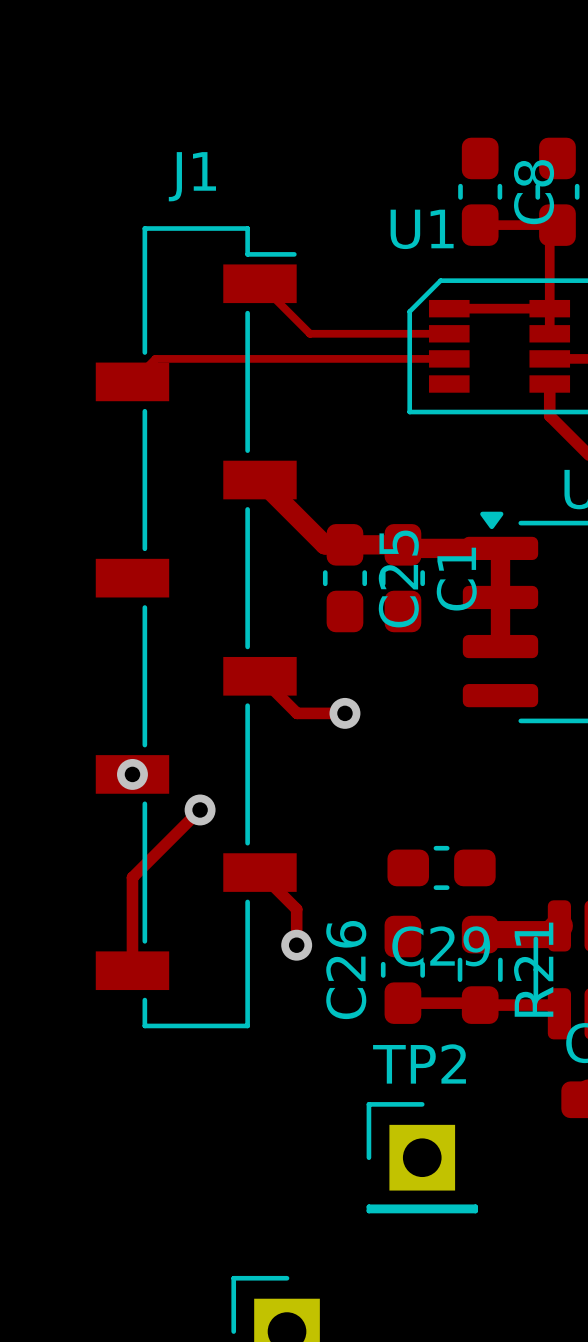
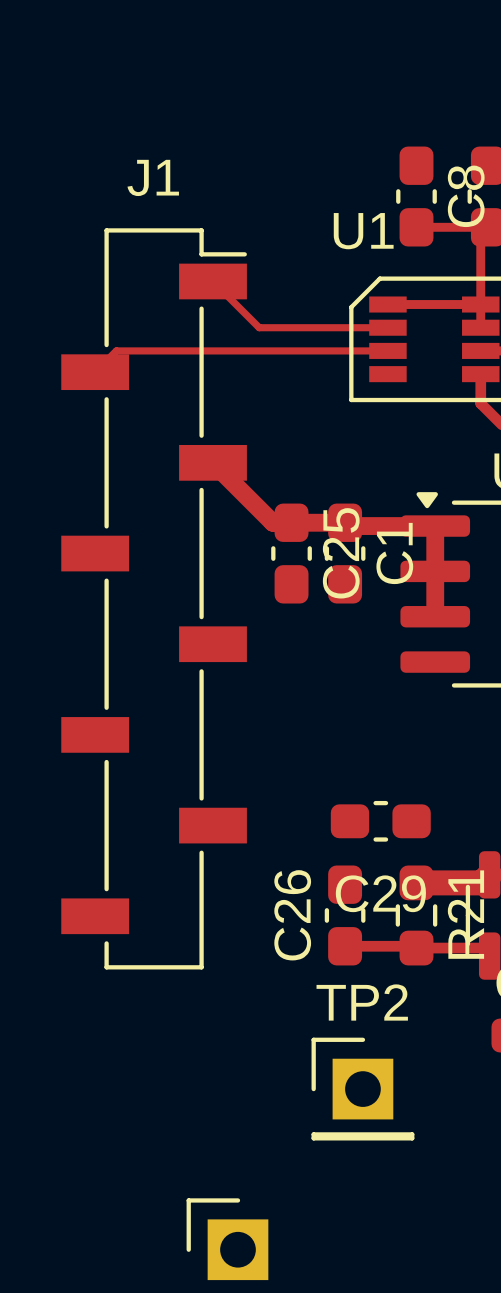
track: (259, 676) (297, 713) (344, 713) -> none
via: (344, 713) -> none
via: (132, 774) -> none
track: (200, 809) (132, 877) (132, 970) -> none
via: (200, 809) -> none
track: (259, 872) (296, 909) (296, 945) -> none
via: (296, 945) -> none

